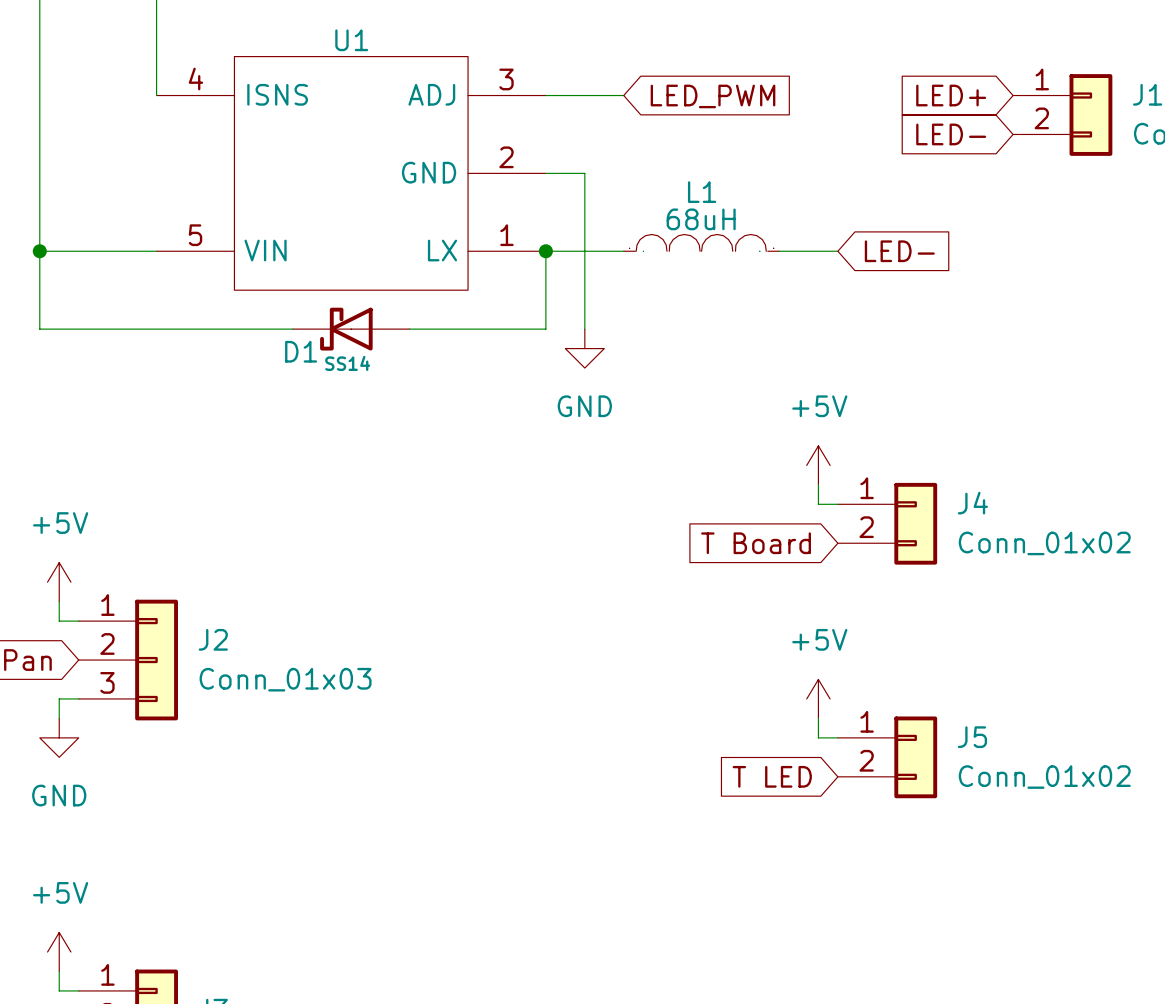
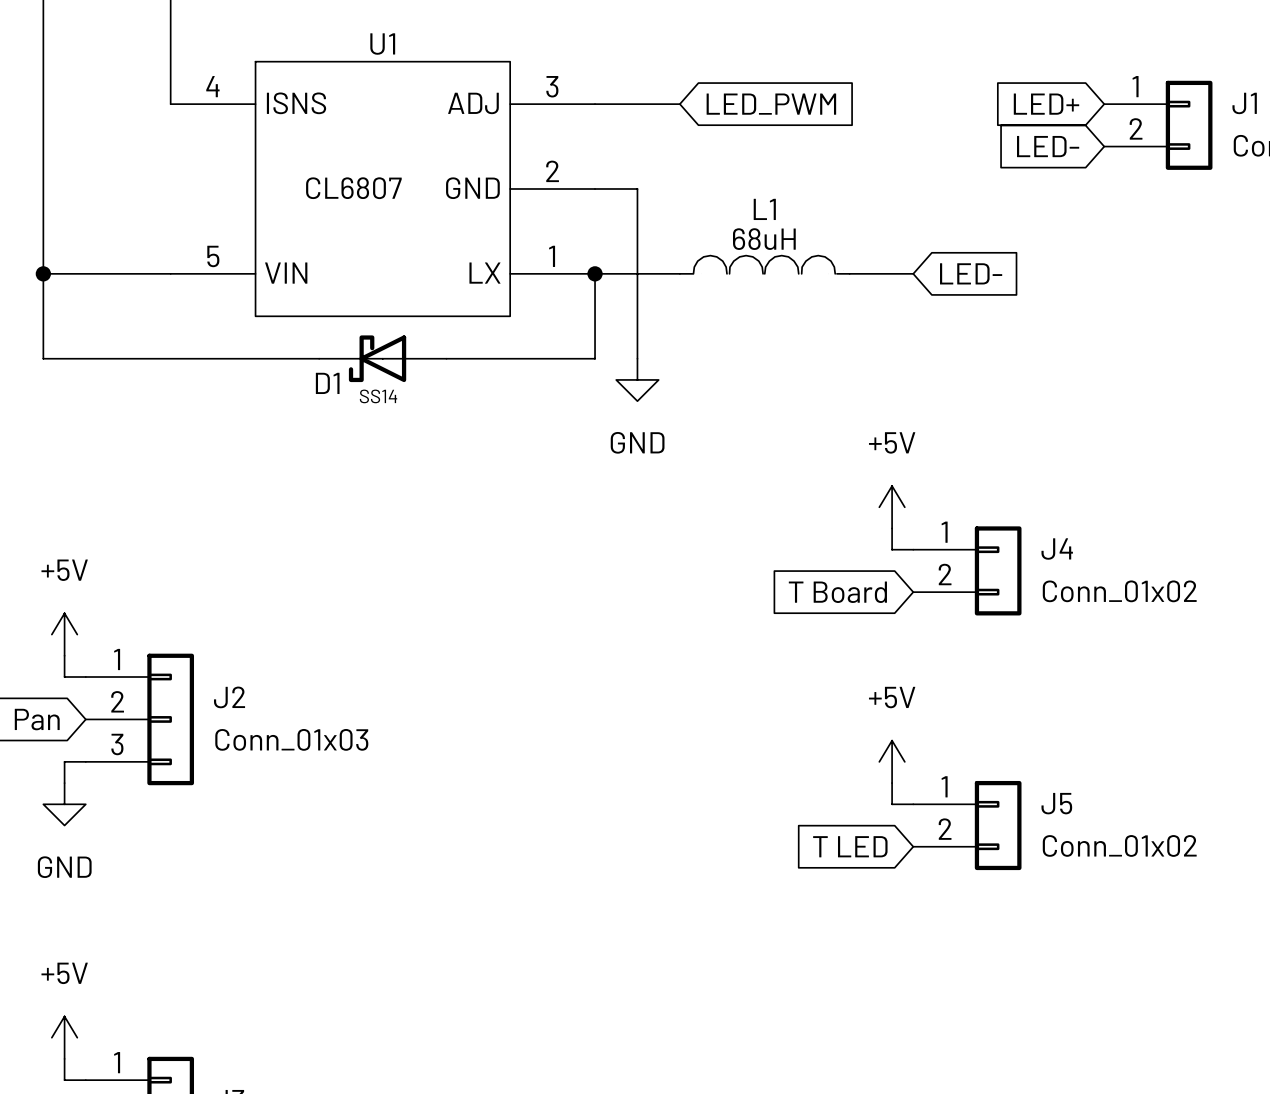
U1 value: none -> CL6807 (353, 188)

